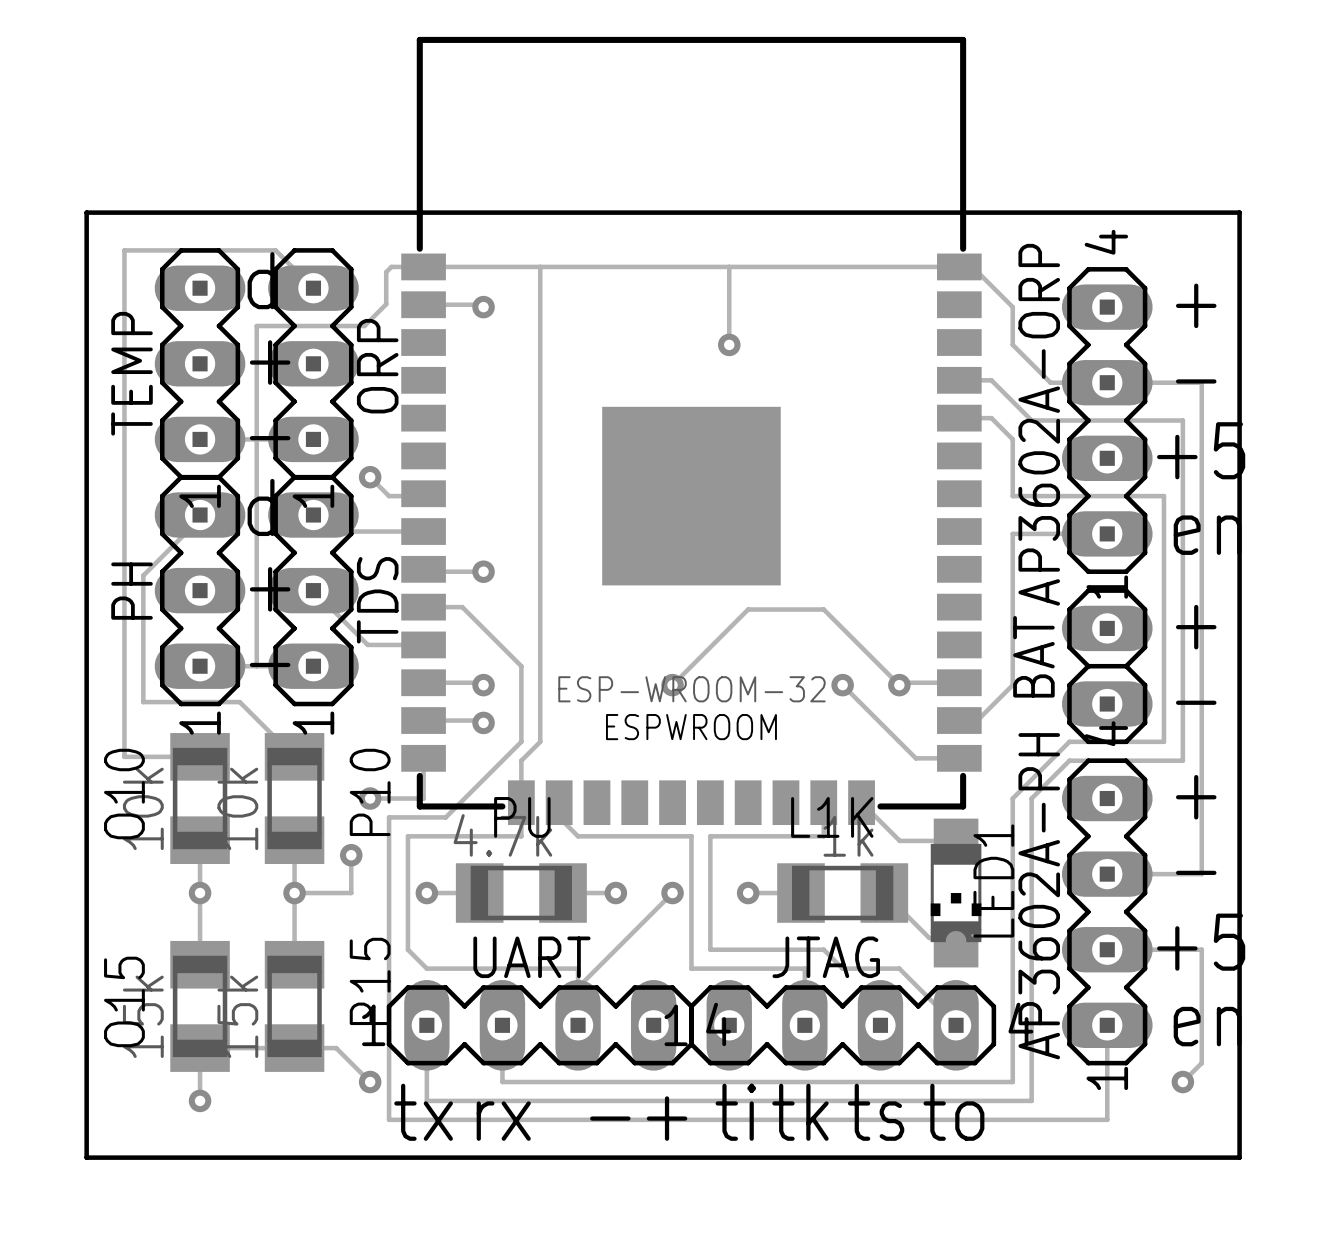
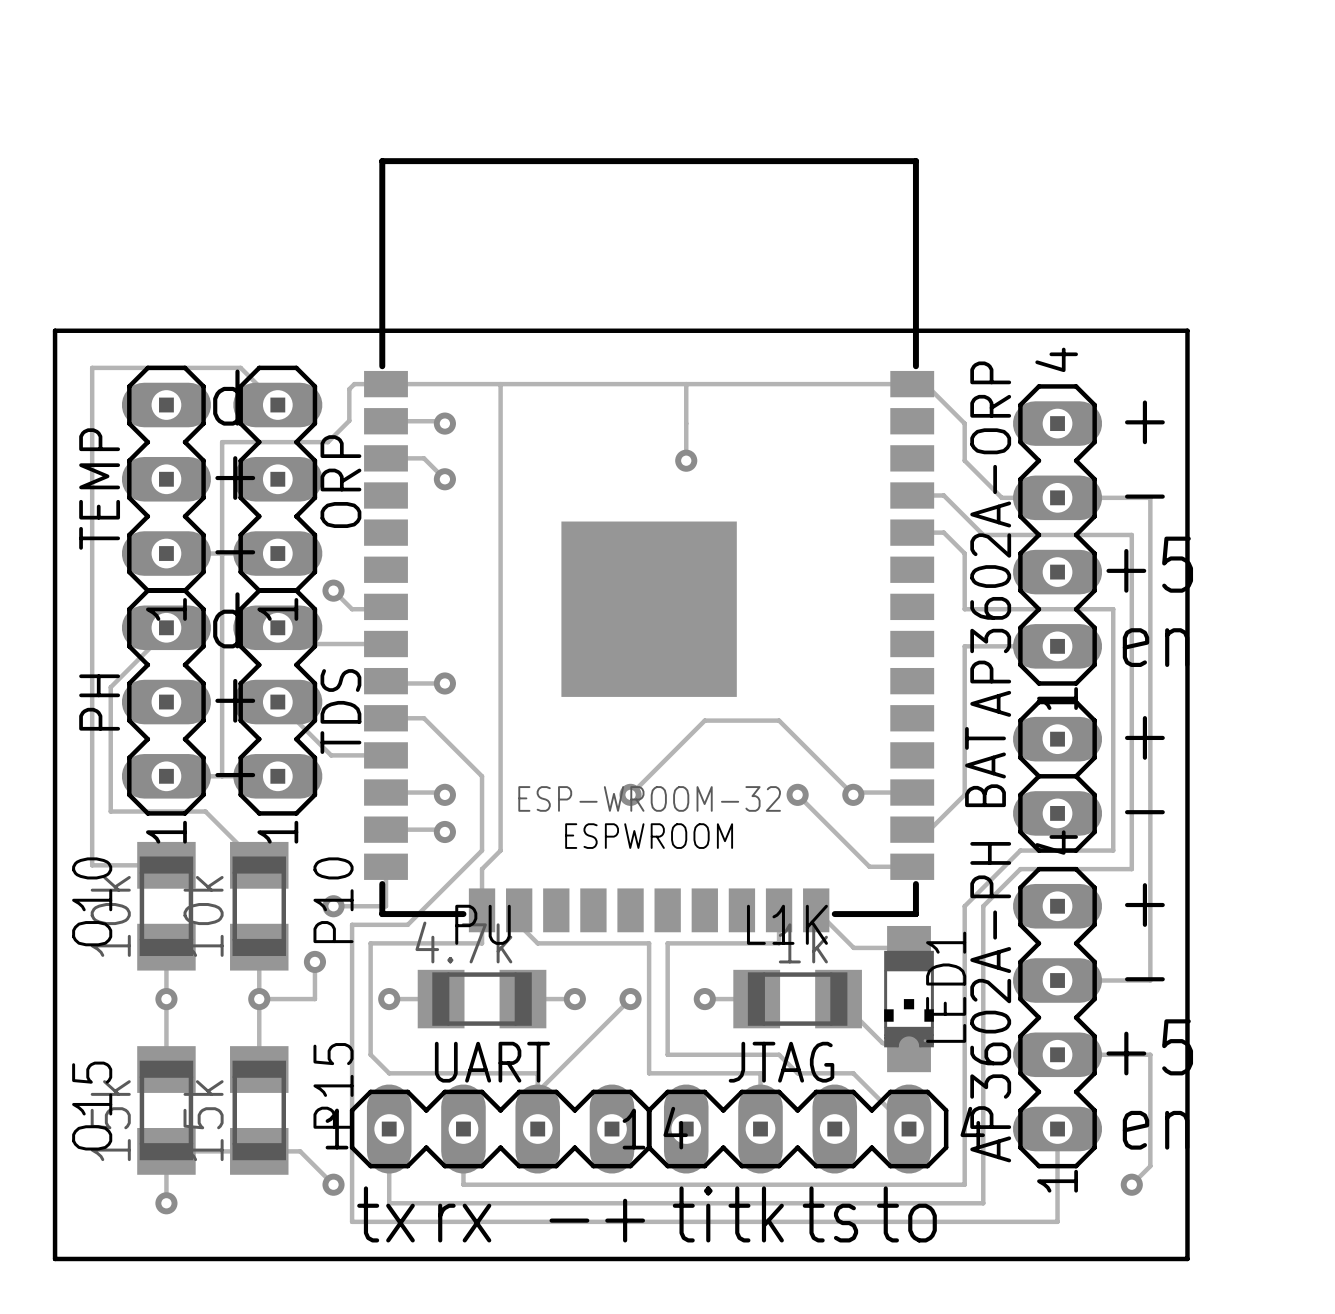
track: none -> (385, 458) (424, 458) (444, 479)
via: none -> (444, 479)

